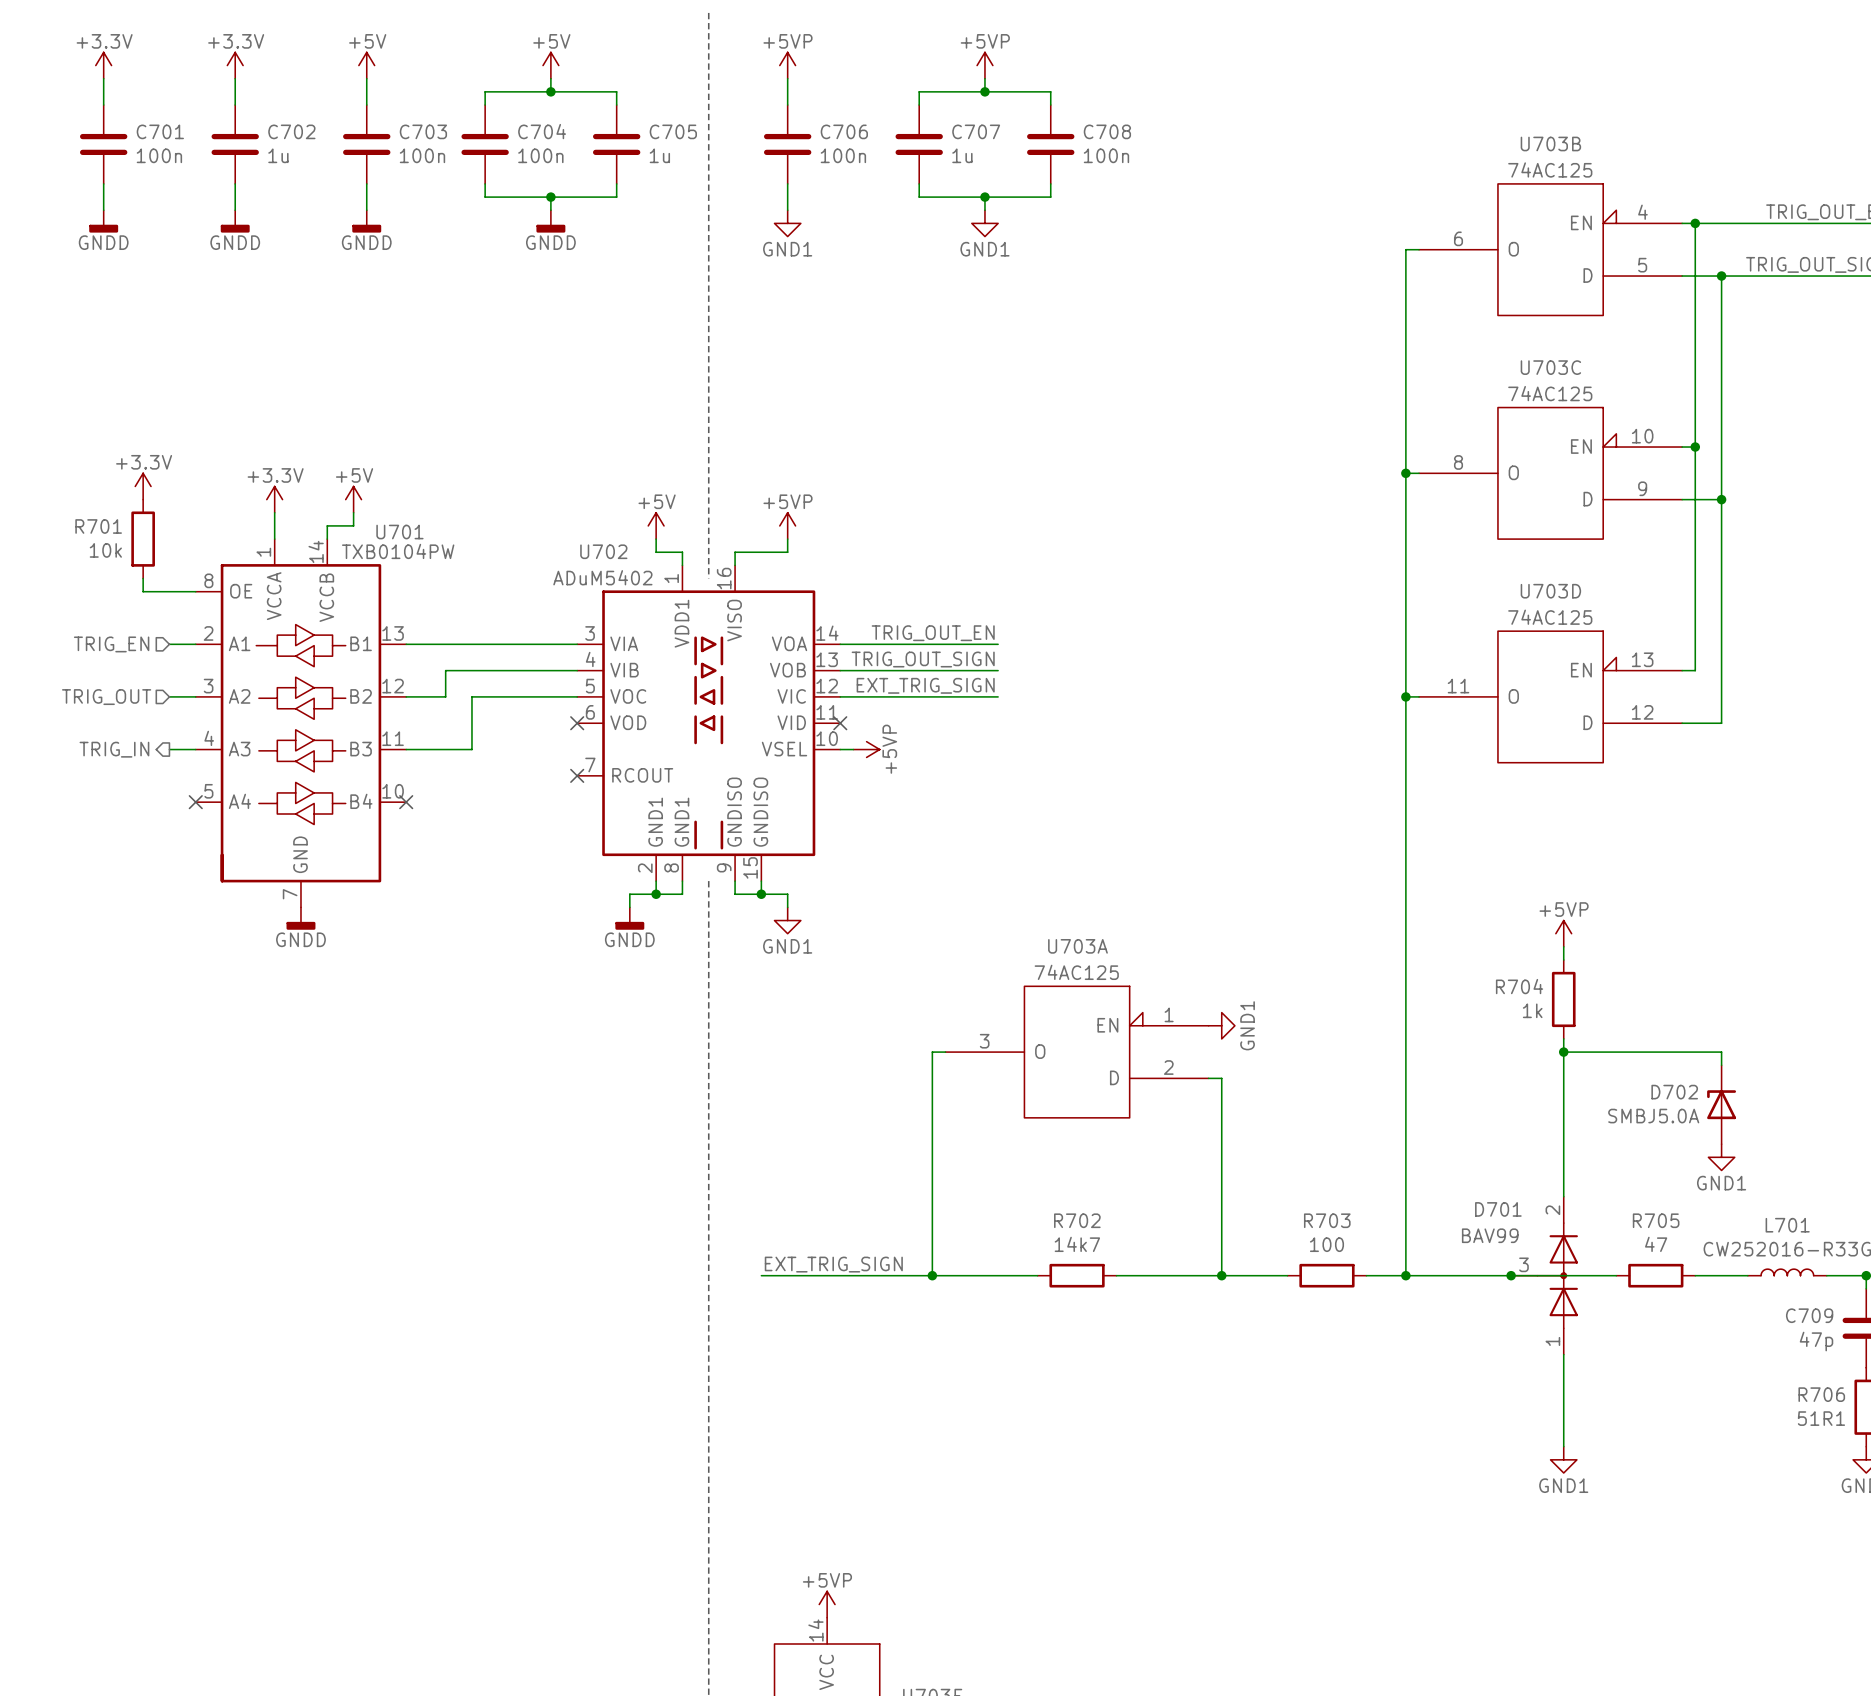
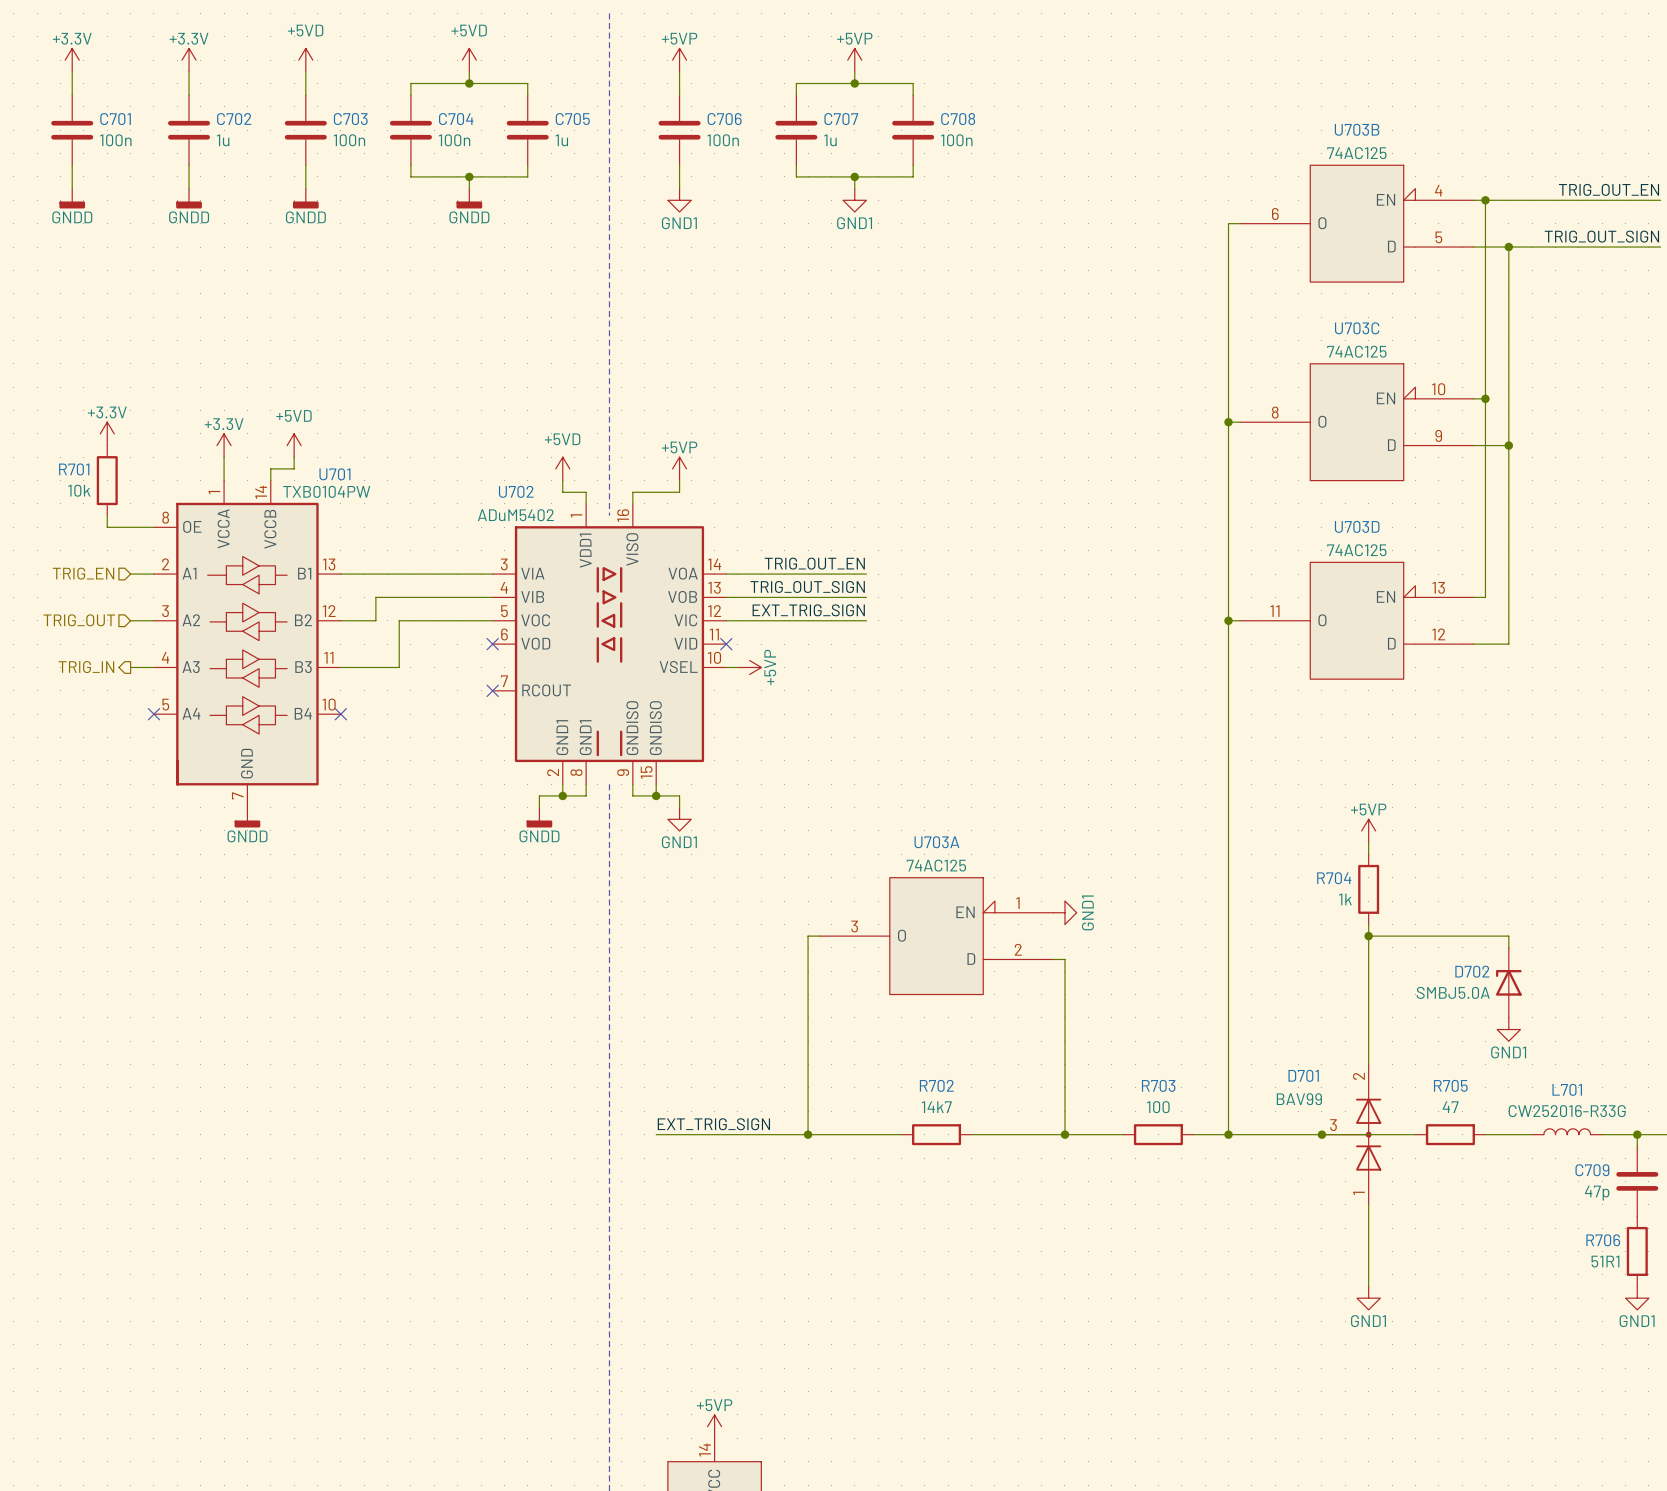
power symbol: +5V (366, 65) -> +5VD (305, 60)
power symbol: +5V (550, 65) -> +5VD (469, 60)
power symbol: +5V (353, 499) -> +5VD (294, 445)
power symbol: +5V (656, 525) -> +5VD (562, 468)

